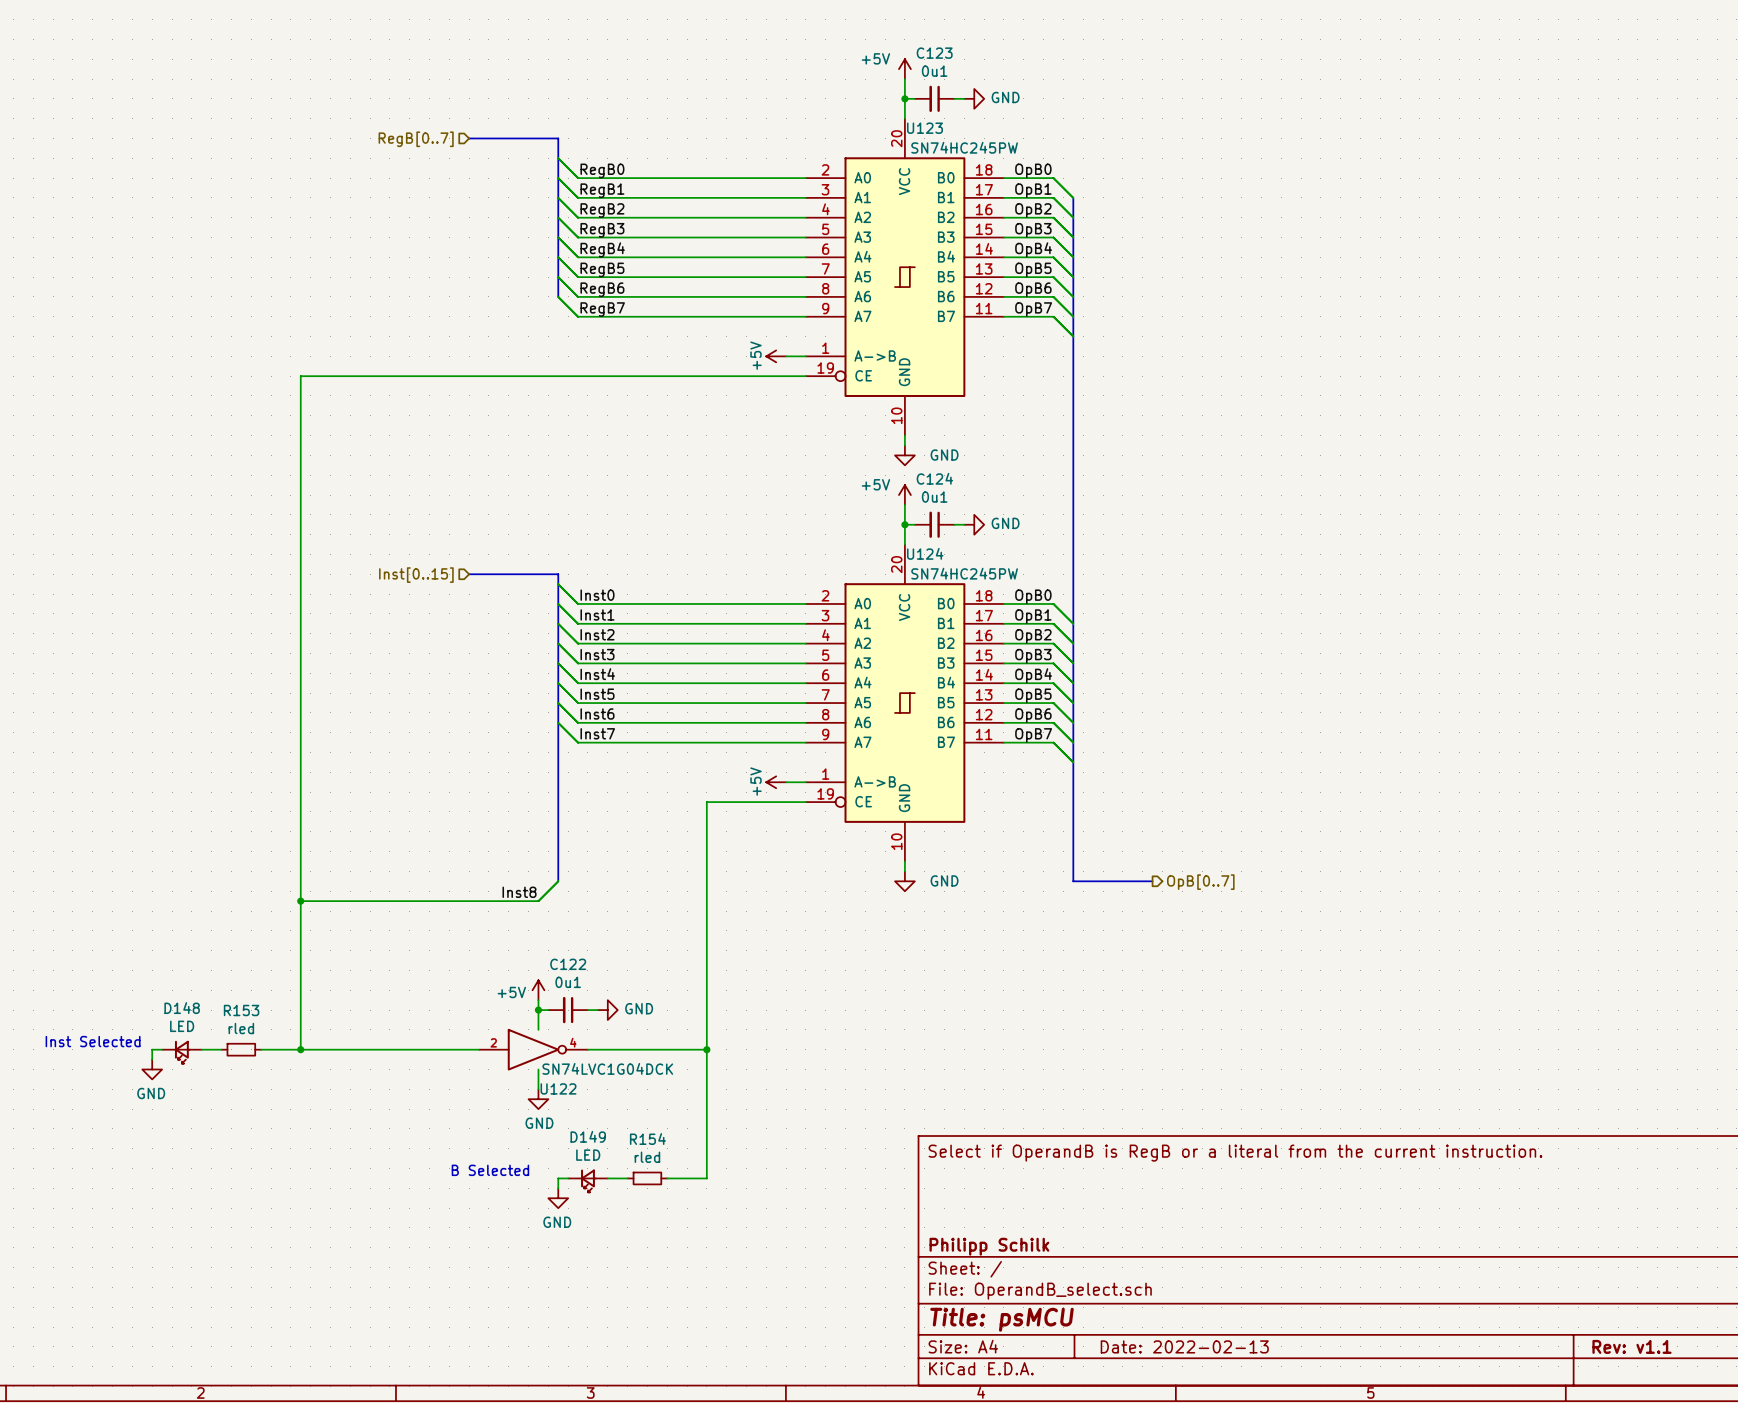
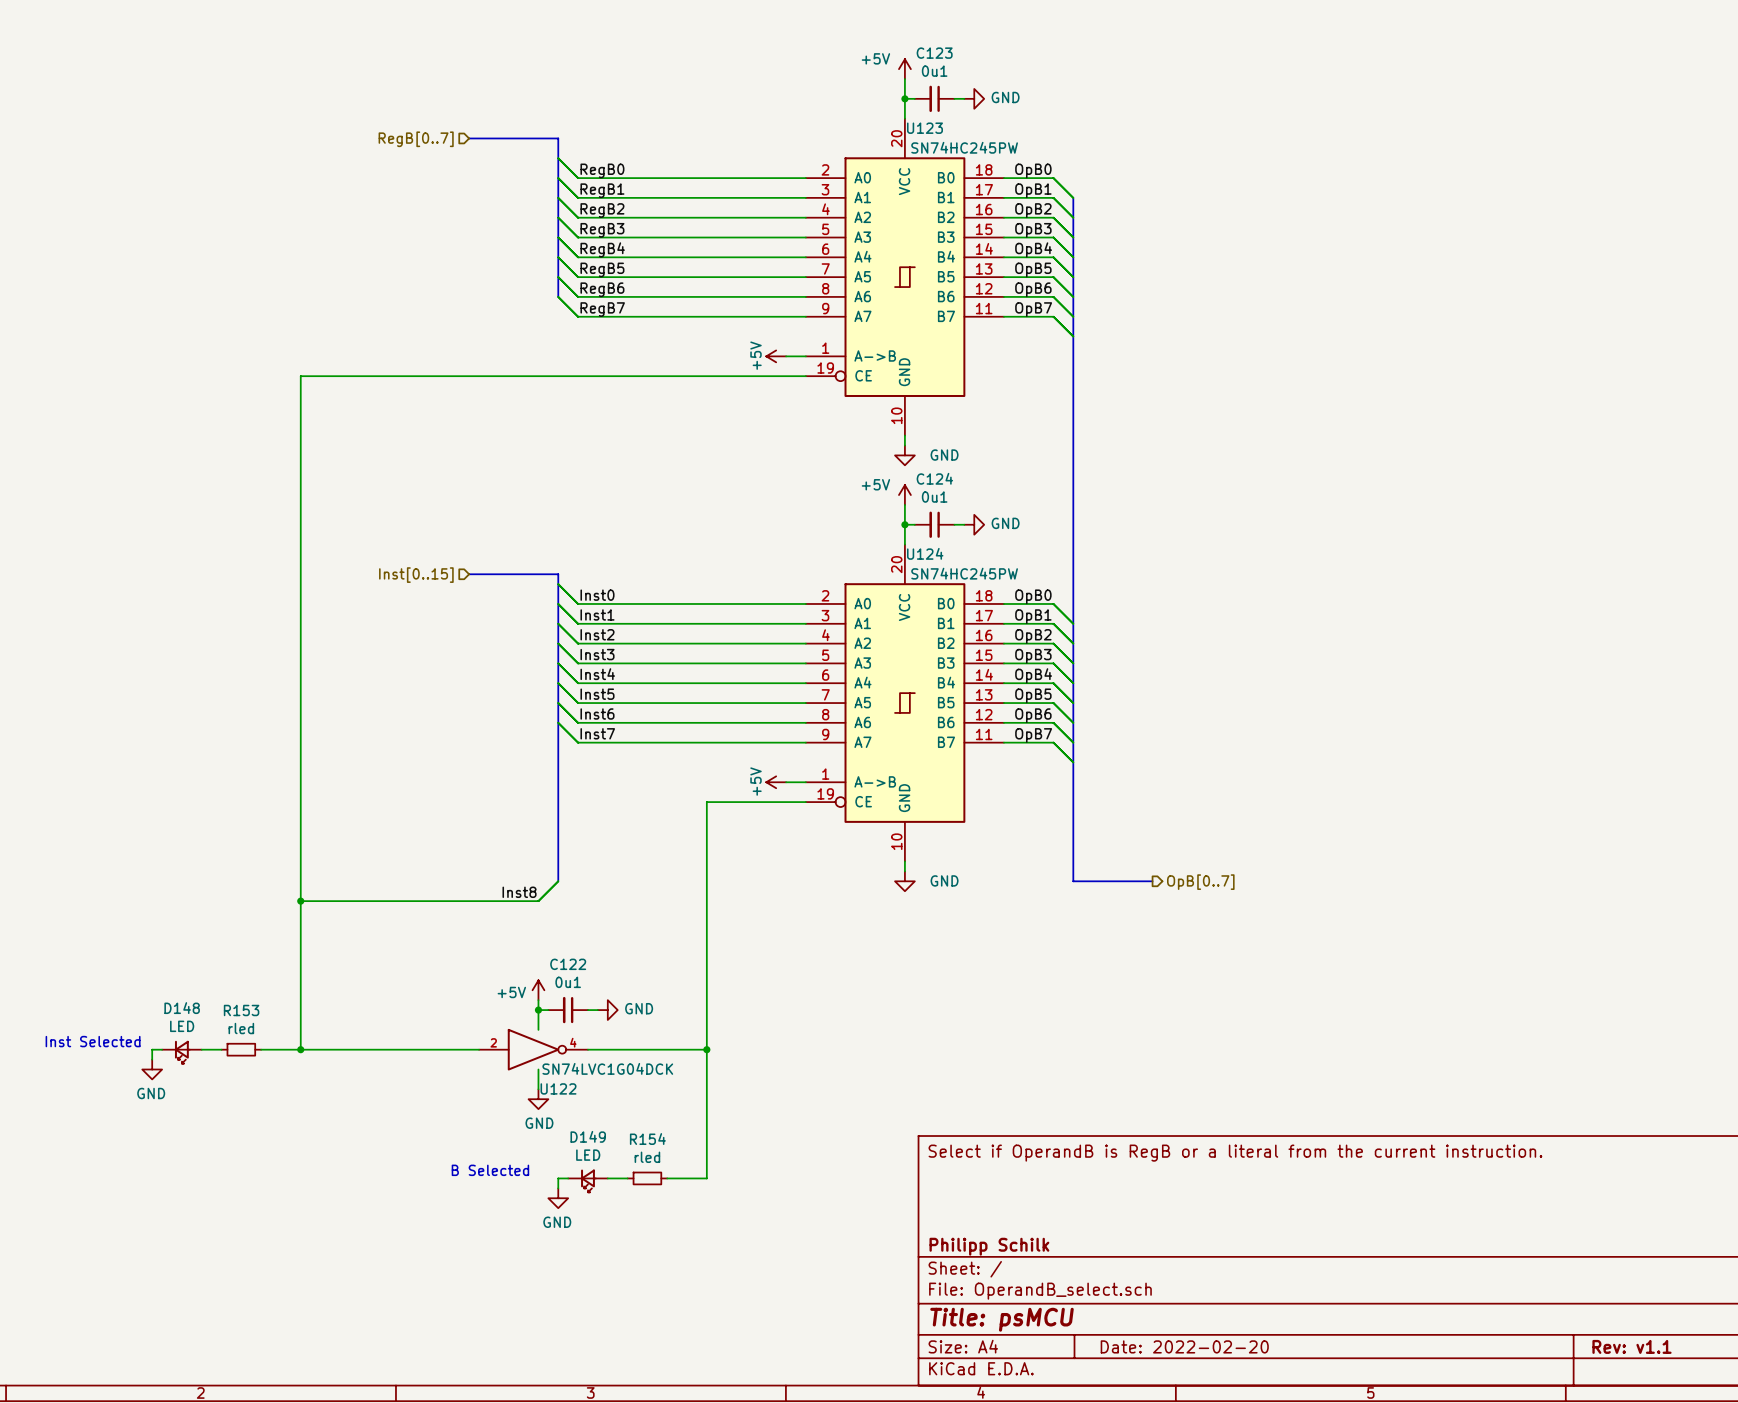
title block: Date: 2022-02-13 (1184, 1346) -> Date: 2022-02-20 (1184, 1346)

